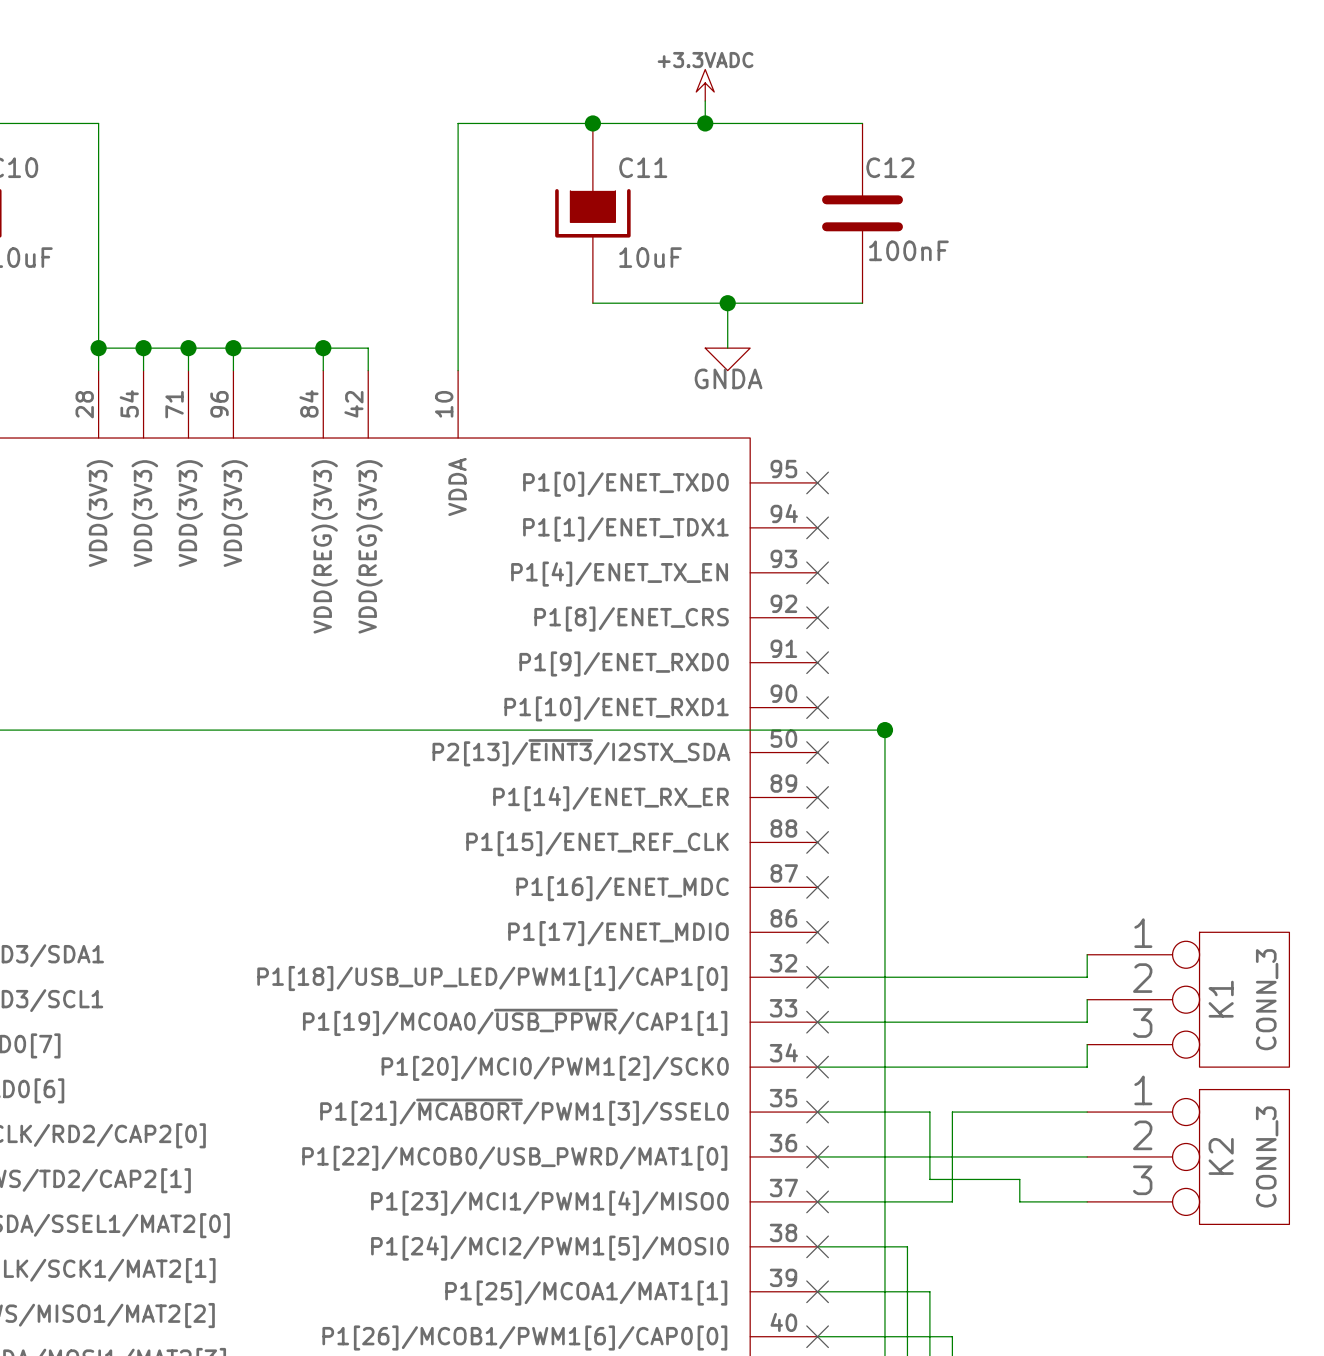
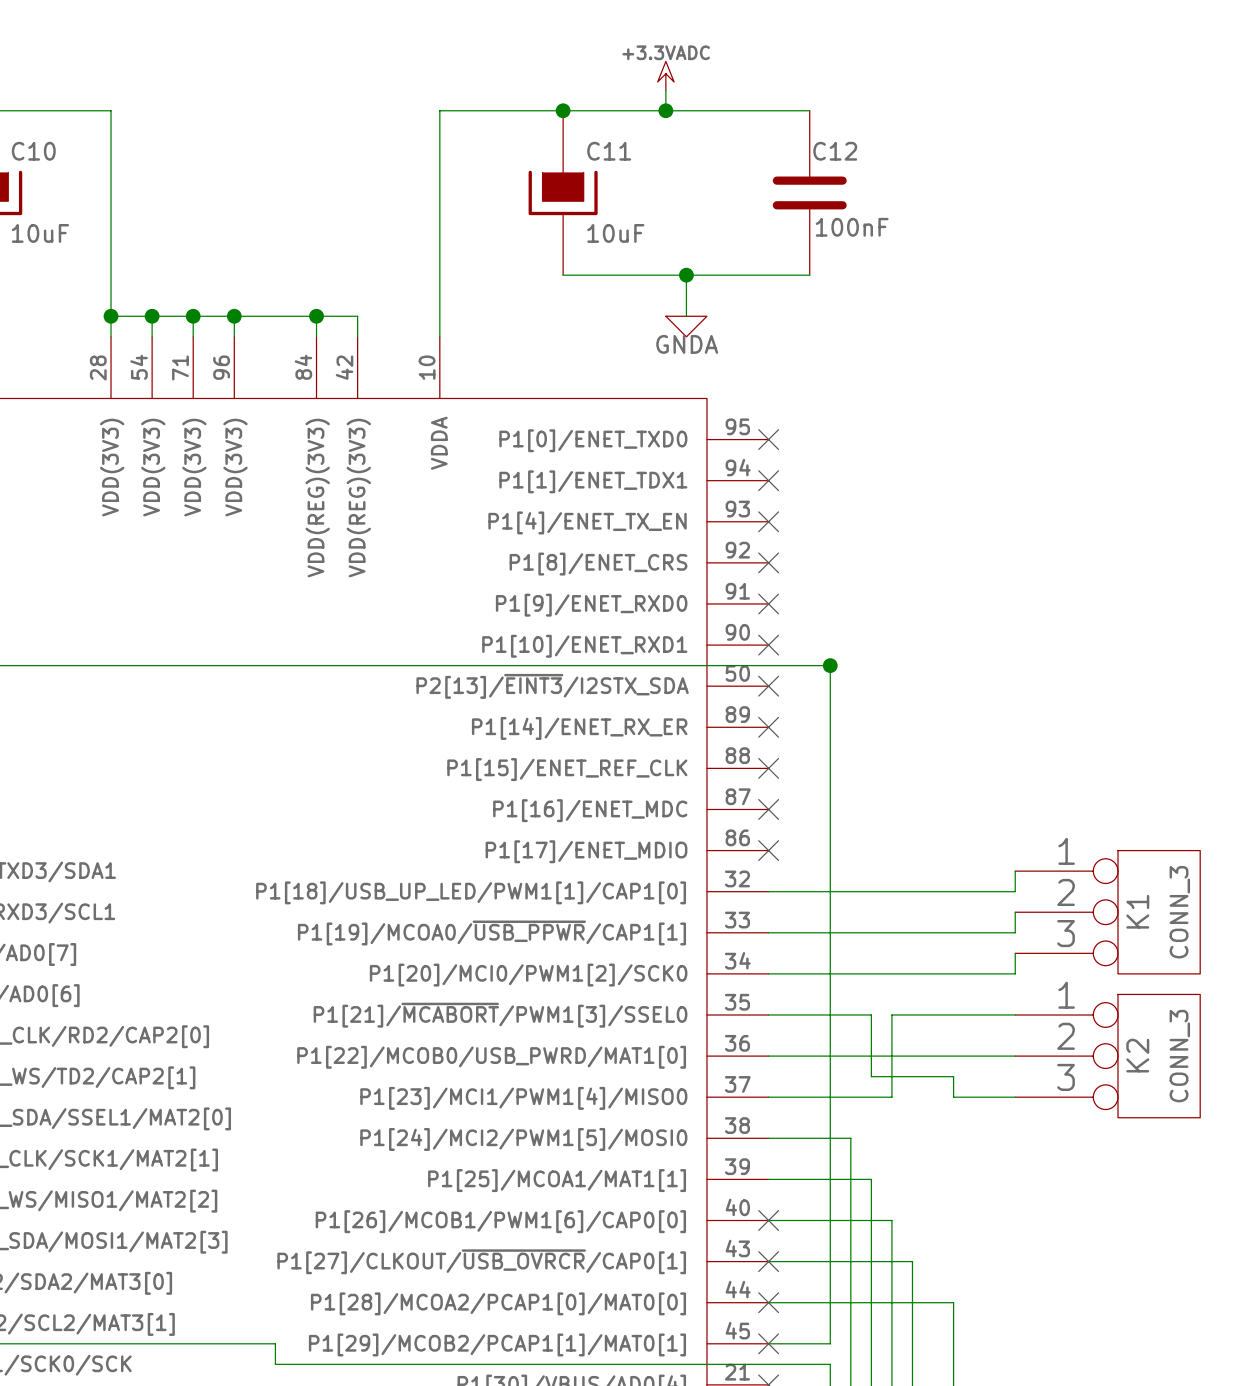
no-connect mark: (817, 977) -> none
no-connect mark: (817, 1022) -> none
no-connect mark: (817, 1067) -> none
no-connect mark: (817, 1112) -> none
no-connect mark: (817, 1156) -> none
no-connect mark: (817, 1201) -> none
no-connect mark: (817, 1246) -> none
no-connect mark: (817, 1291) -> none

